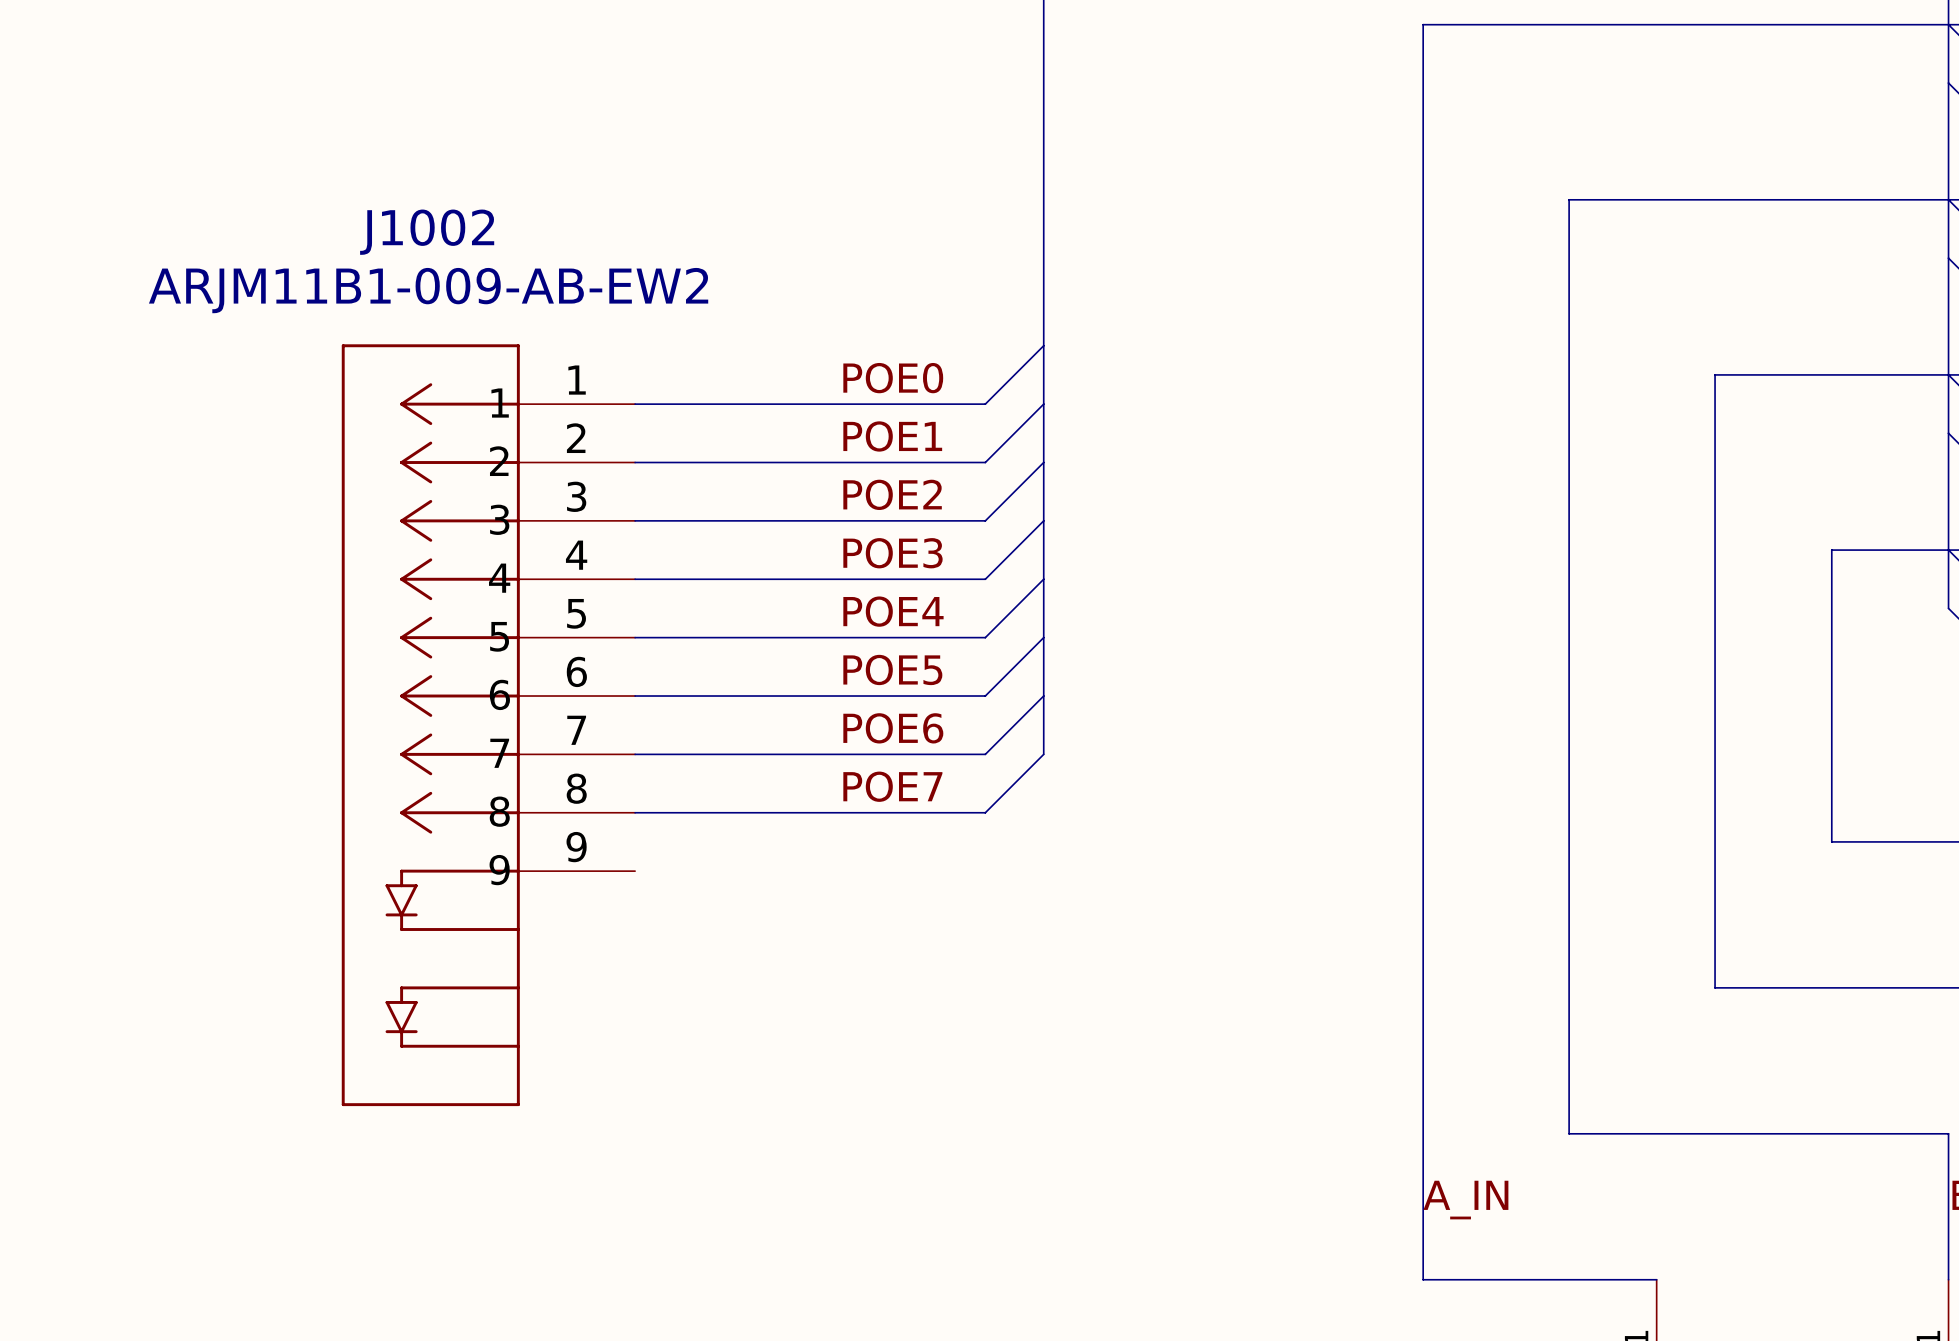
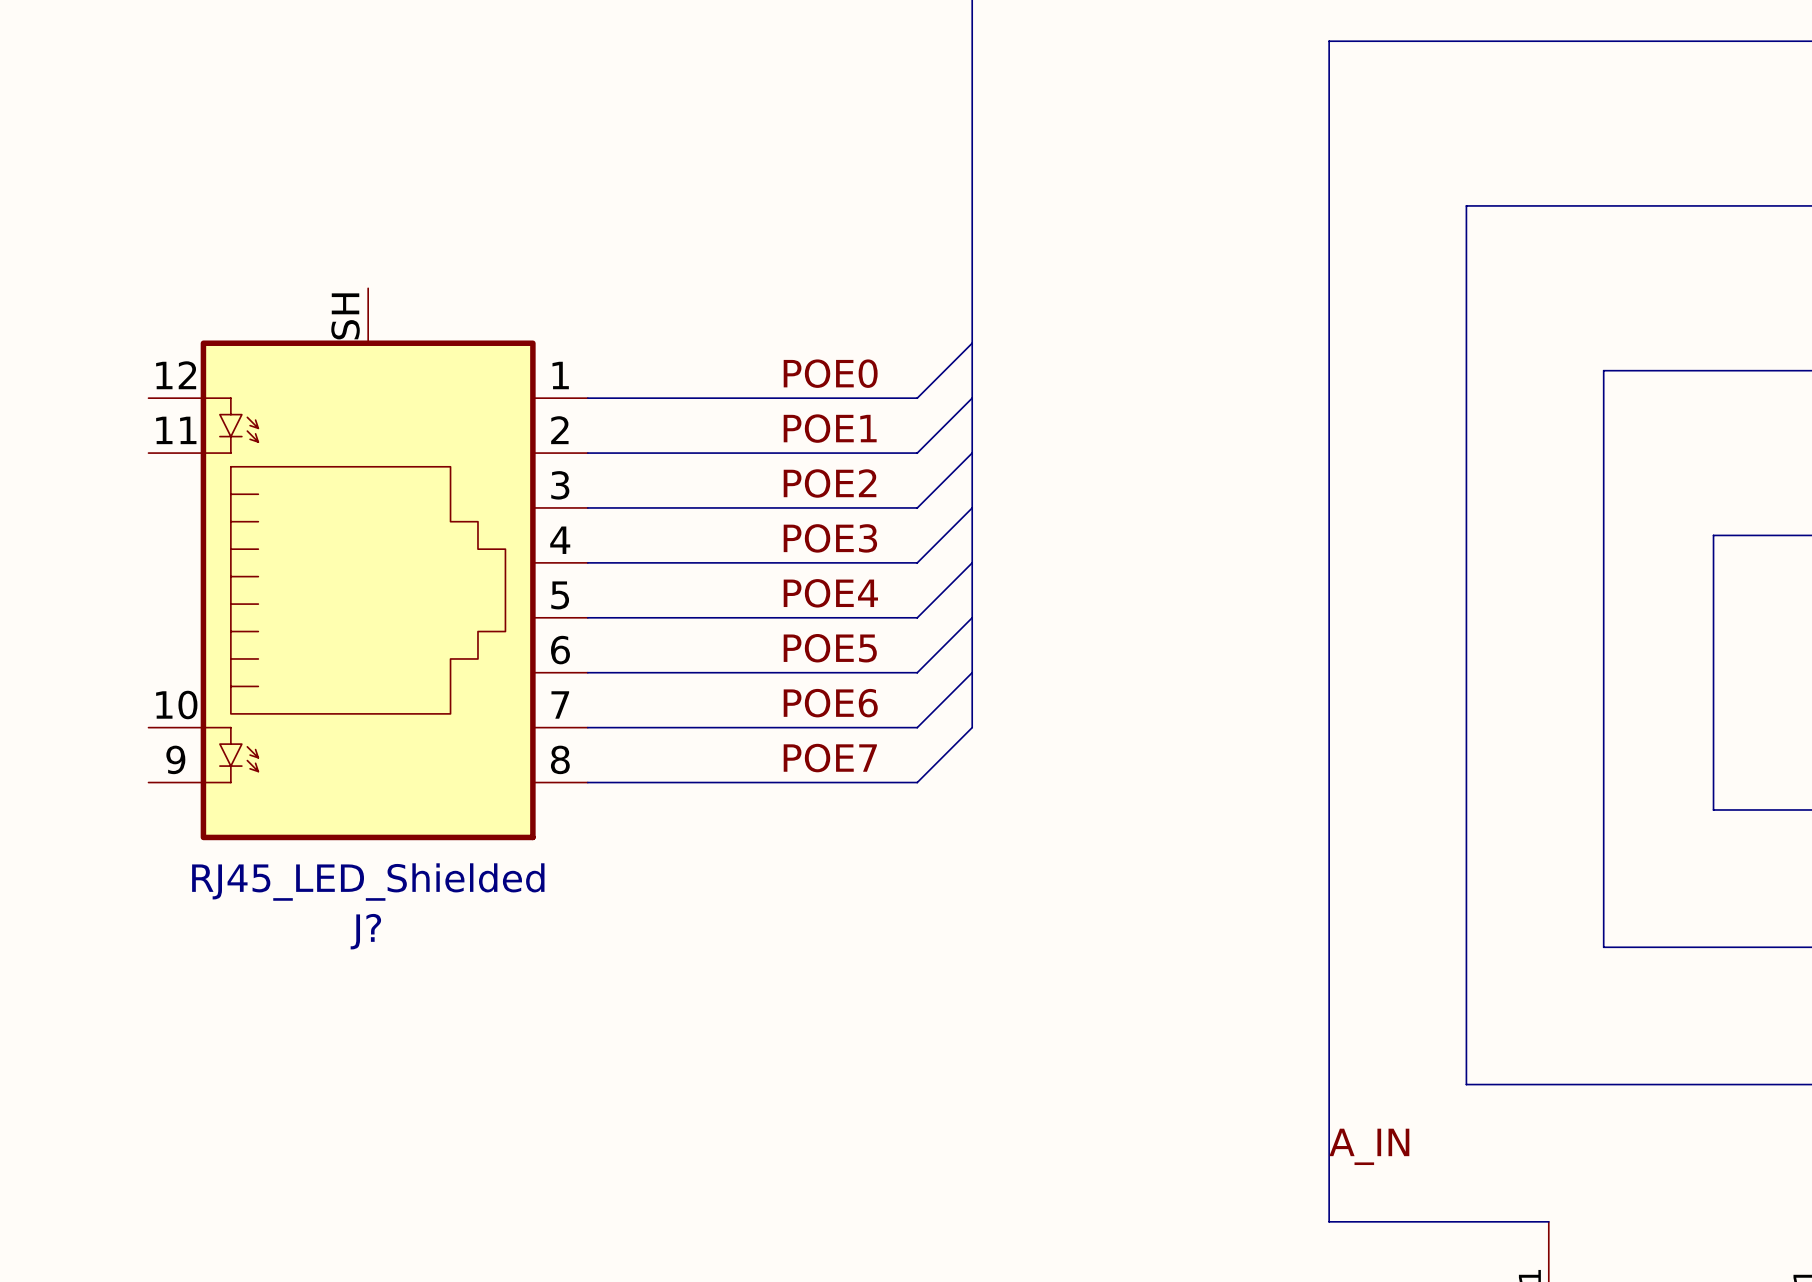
J?: none -> RJ45_LED_Shielded (368, 564)
J1002: ARJM11B1-009-AB-EW2 (488, 725) -> none

